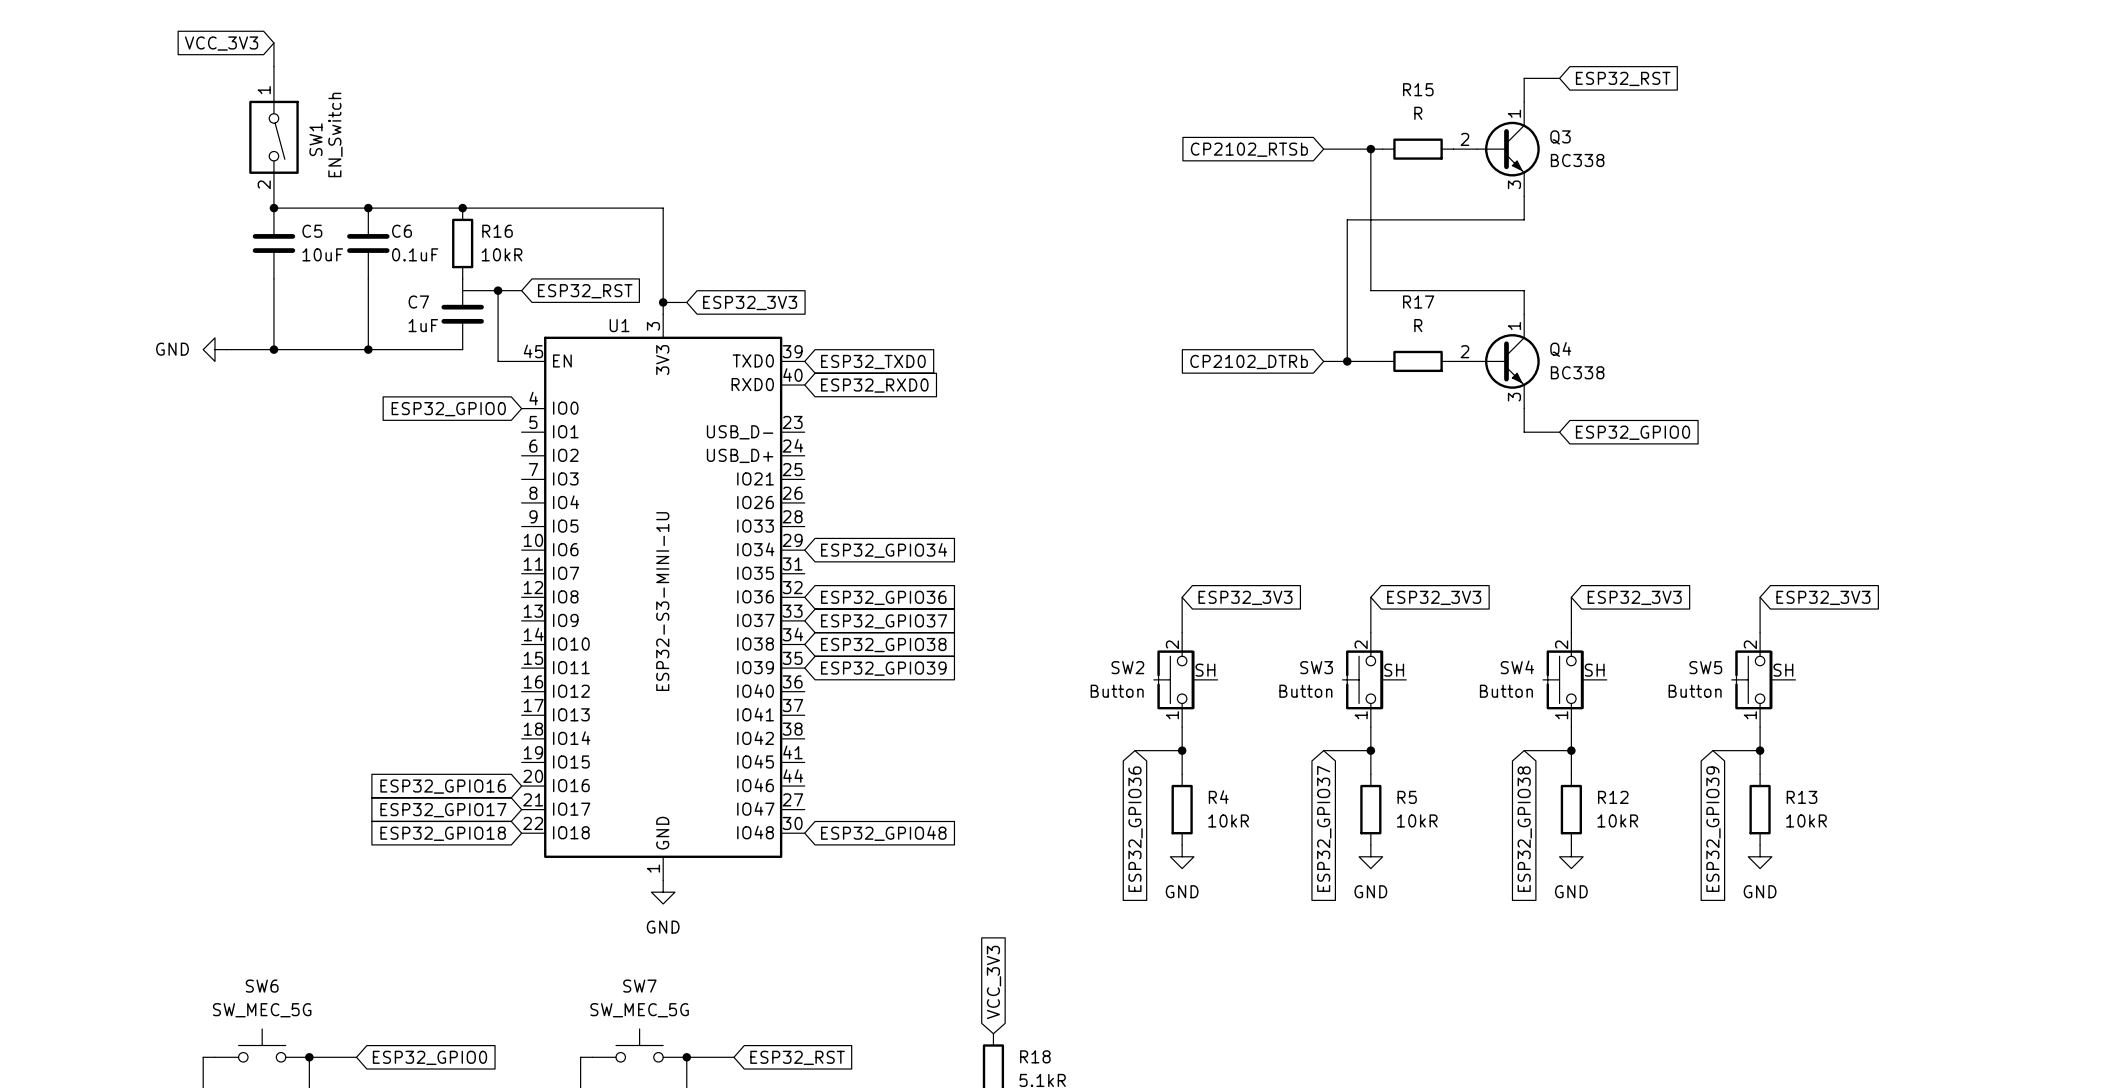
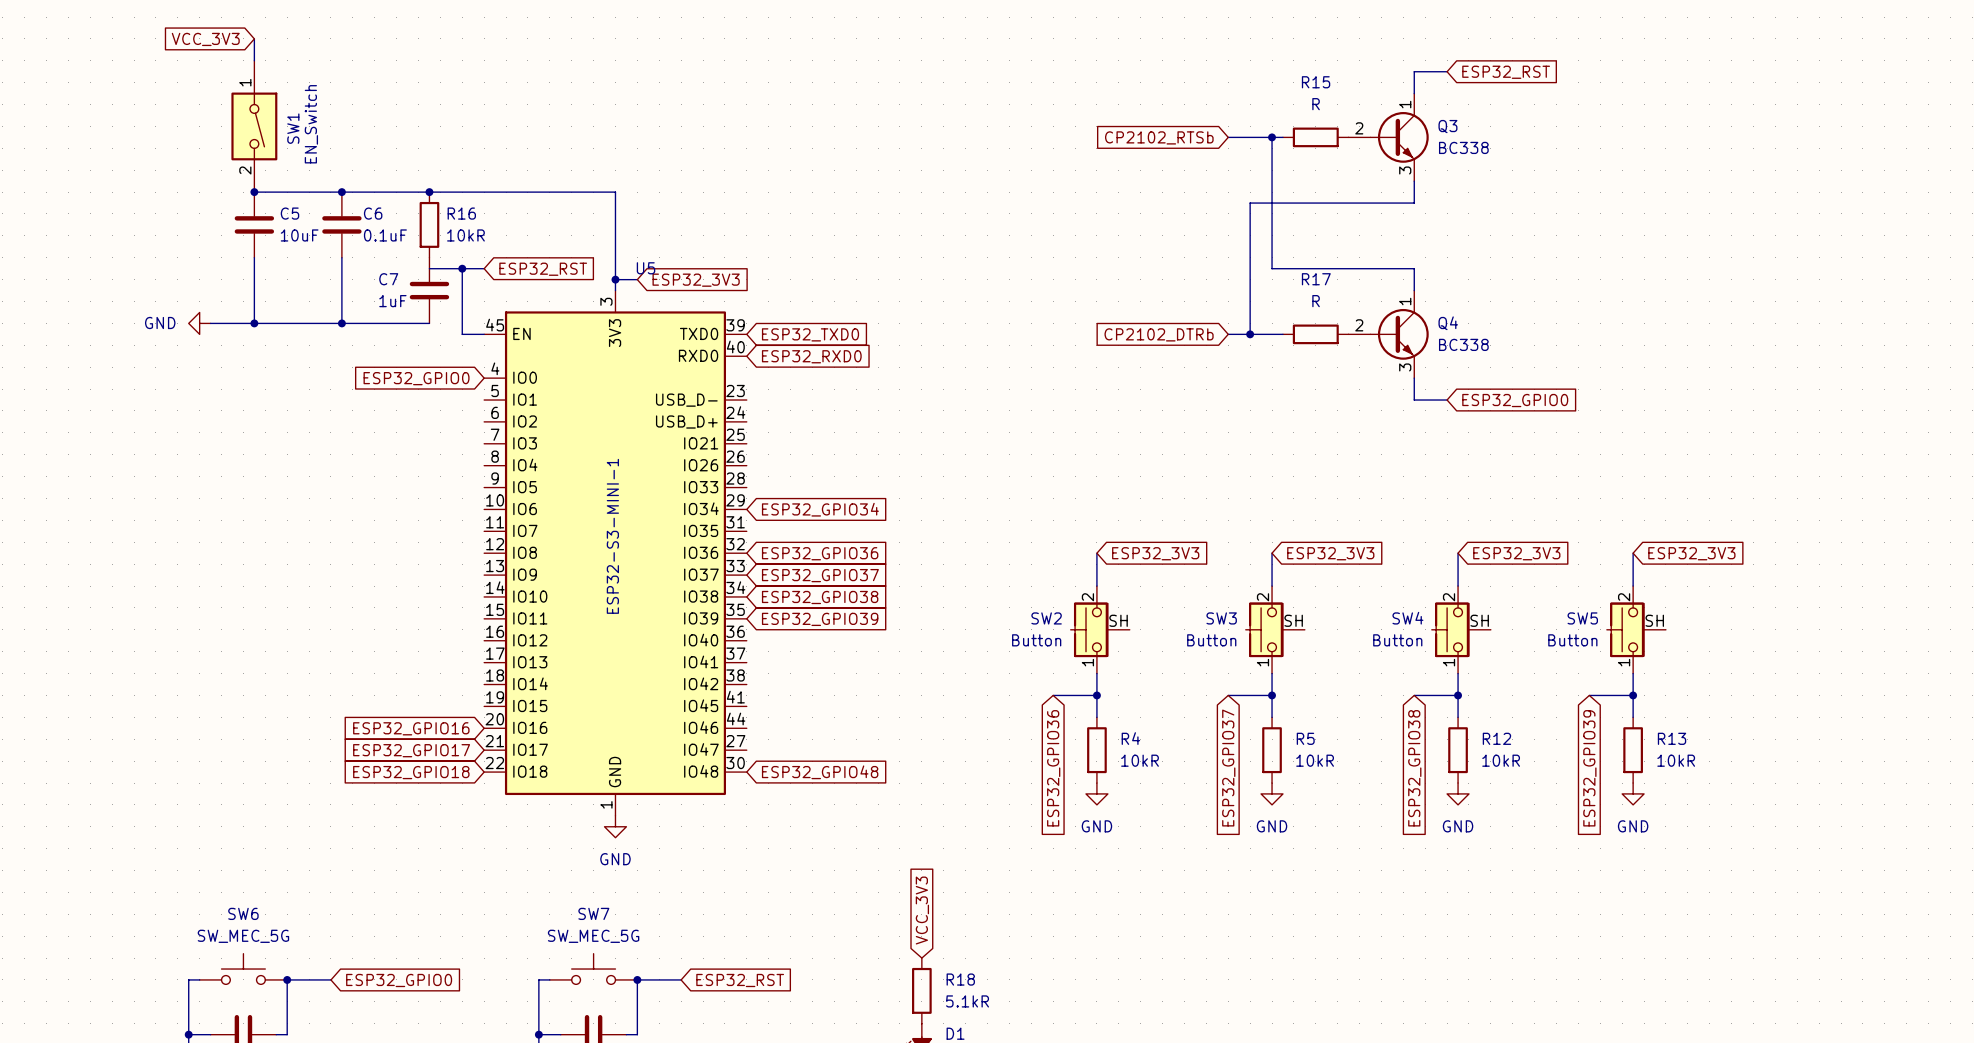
U1 name: U1 (619, 325) -> U5 (646, 268)
U1 value: ESP32-S3-MINI-1U (662, 601) -> ESP32-S3-MINI-1 (612, 536)

